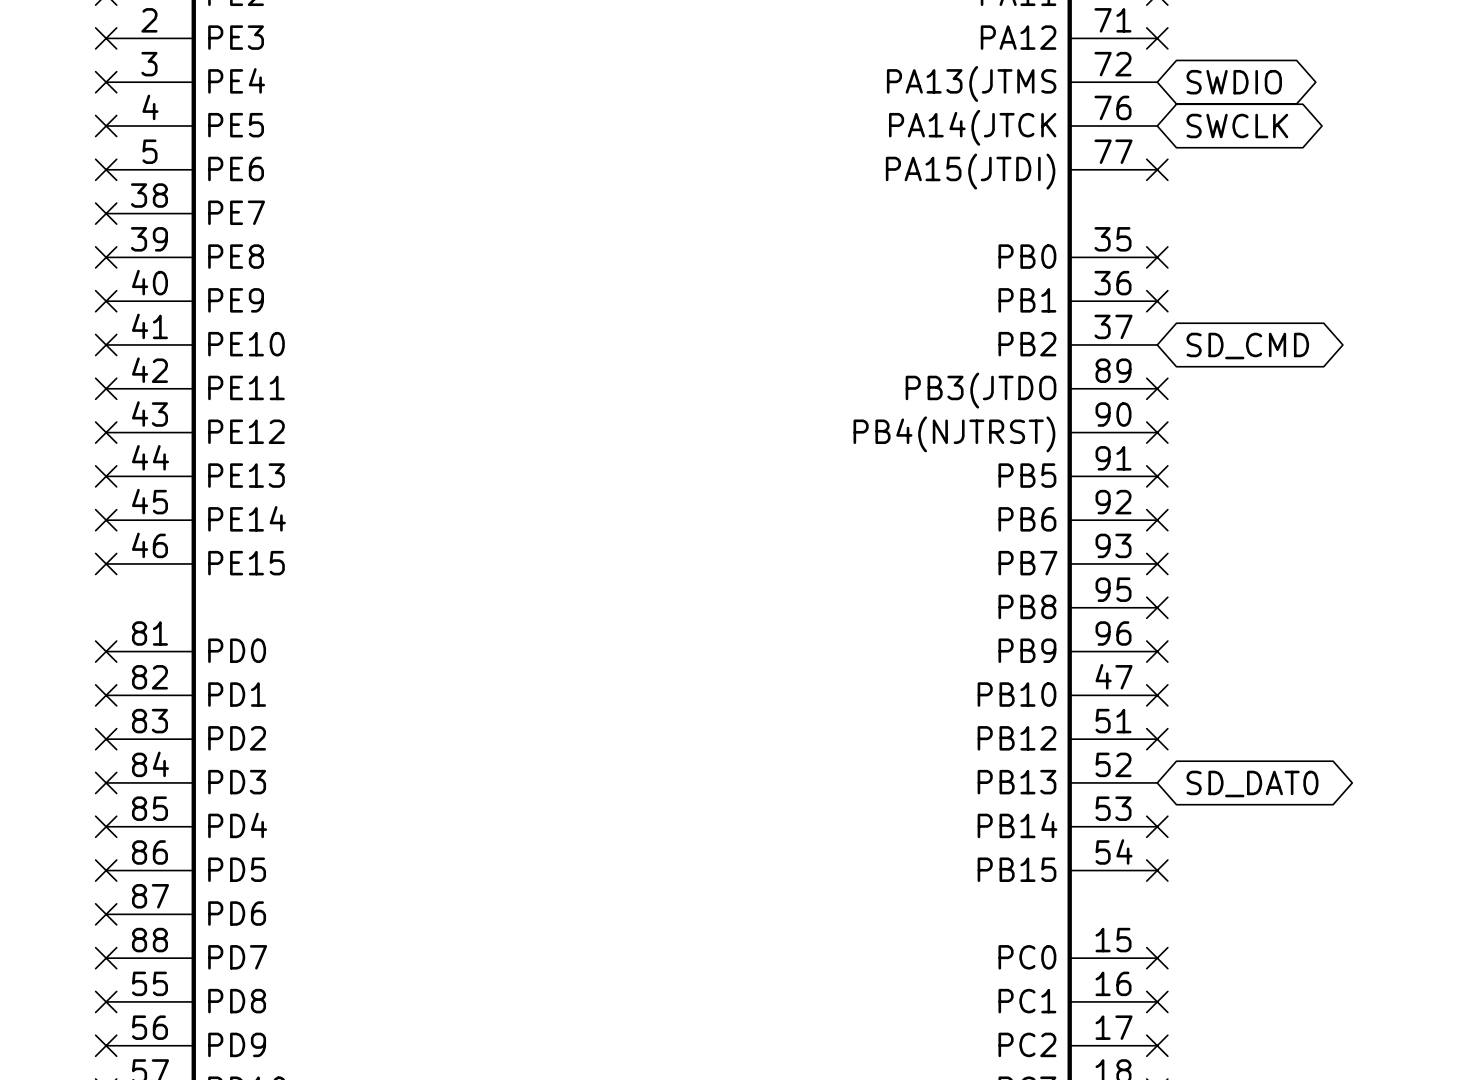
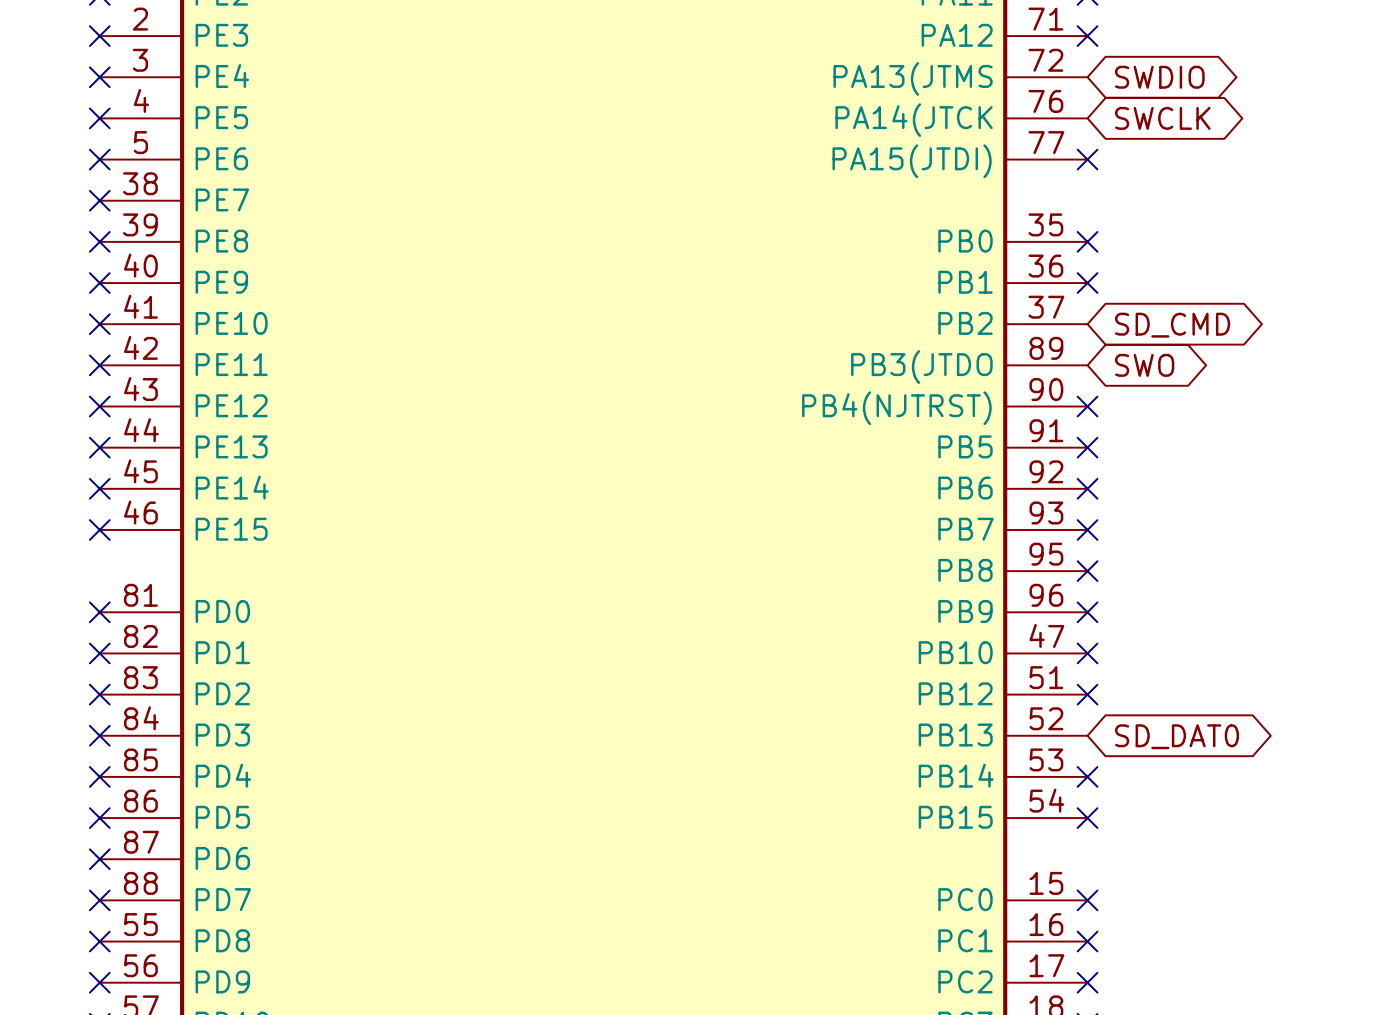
no-connect mark: (1157, 388) -> none
global label: none -> SWO (1144, 365)

